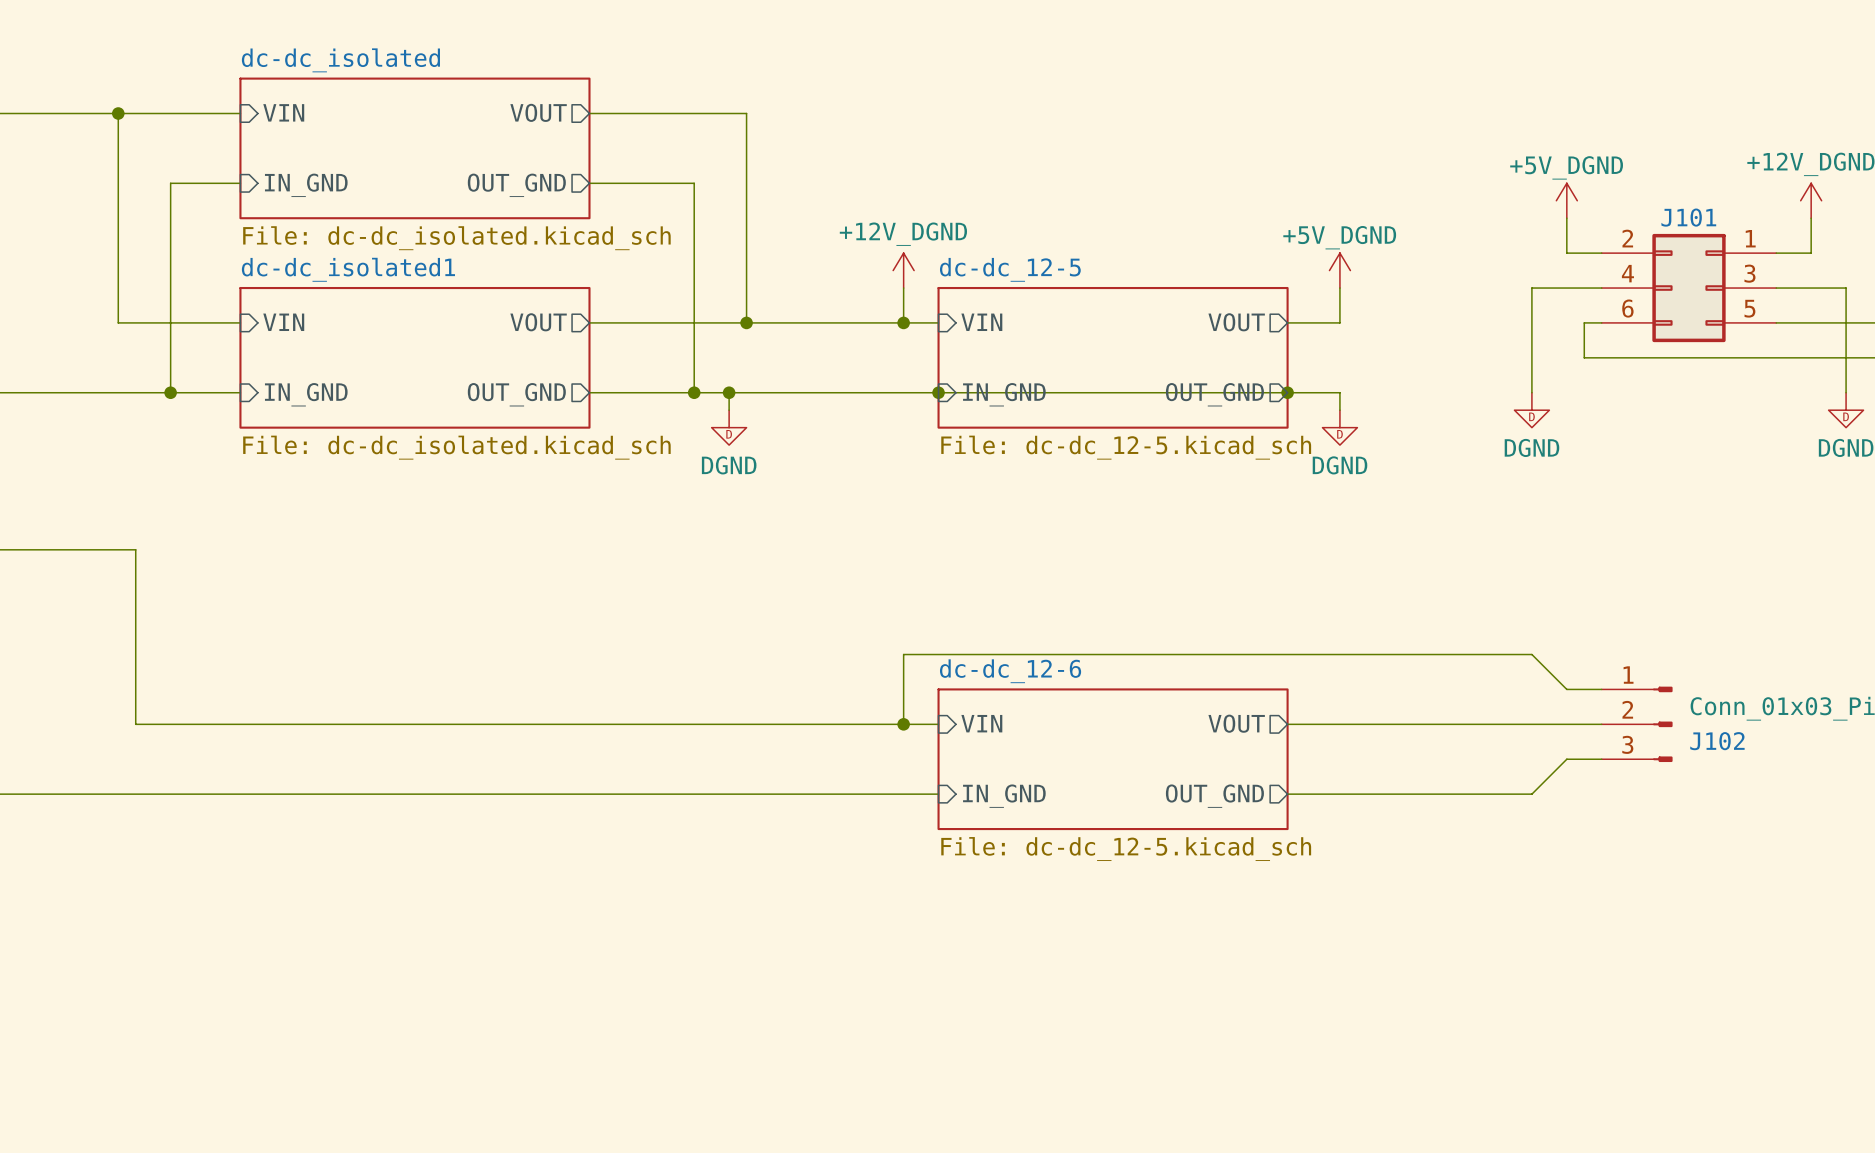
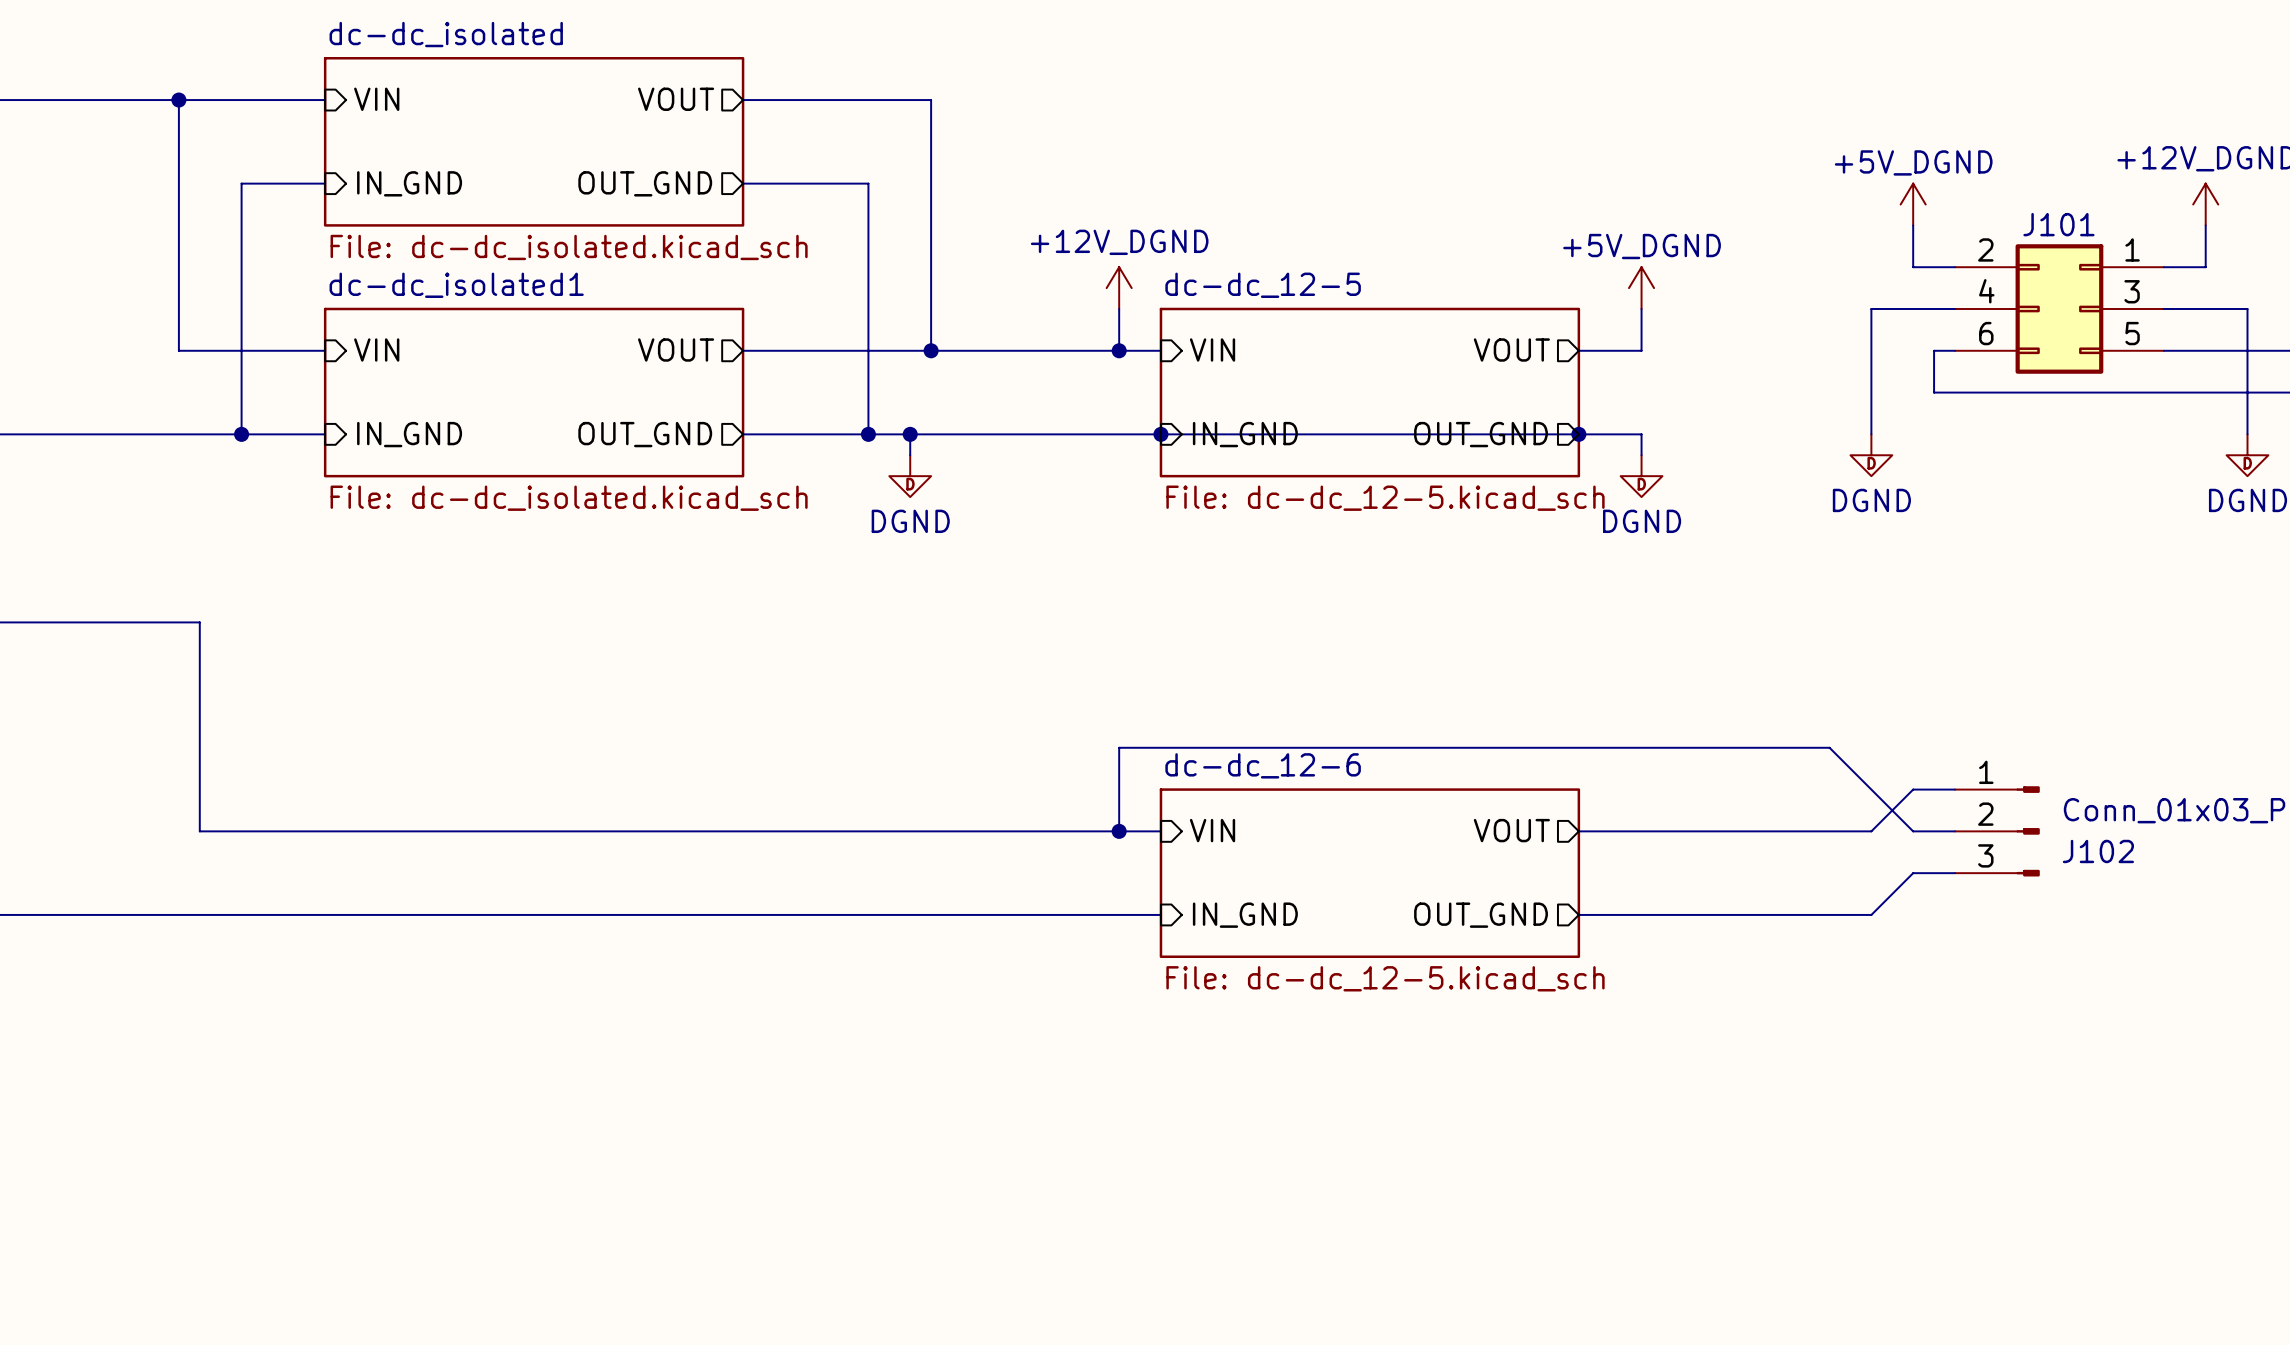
wire: (1497, 654) (1531, 654) (1566, 689) -> (1829, 747) (1913, 831)
wire: (1531, 724) (1566, 724) -> (1871, 831) (1913, 789)

